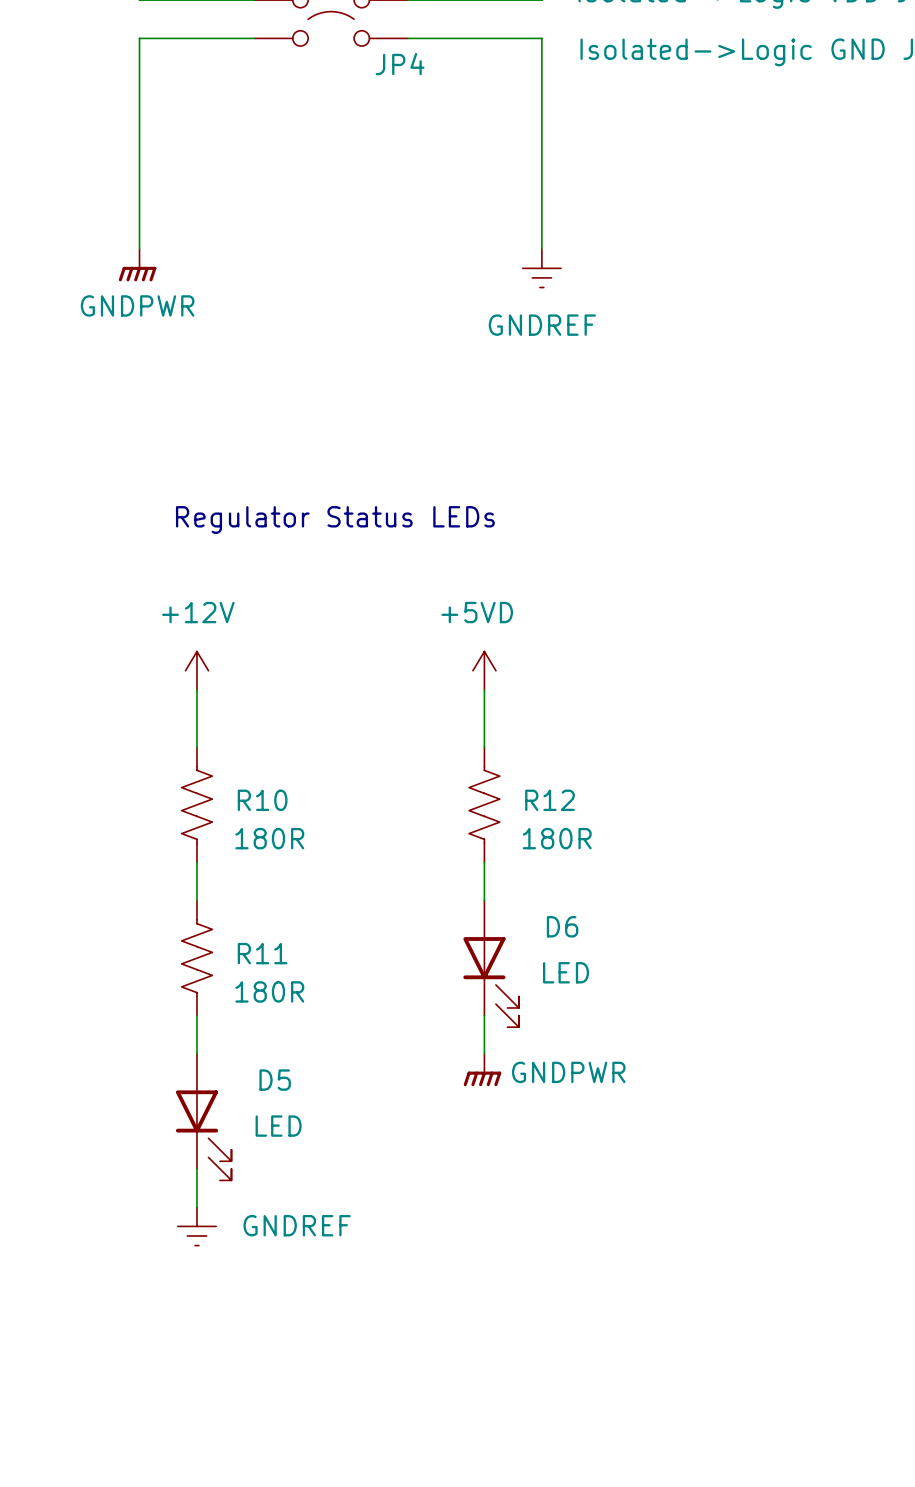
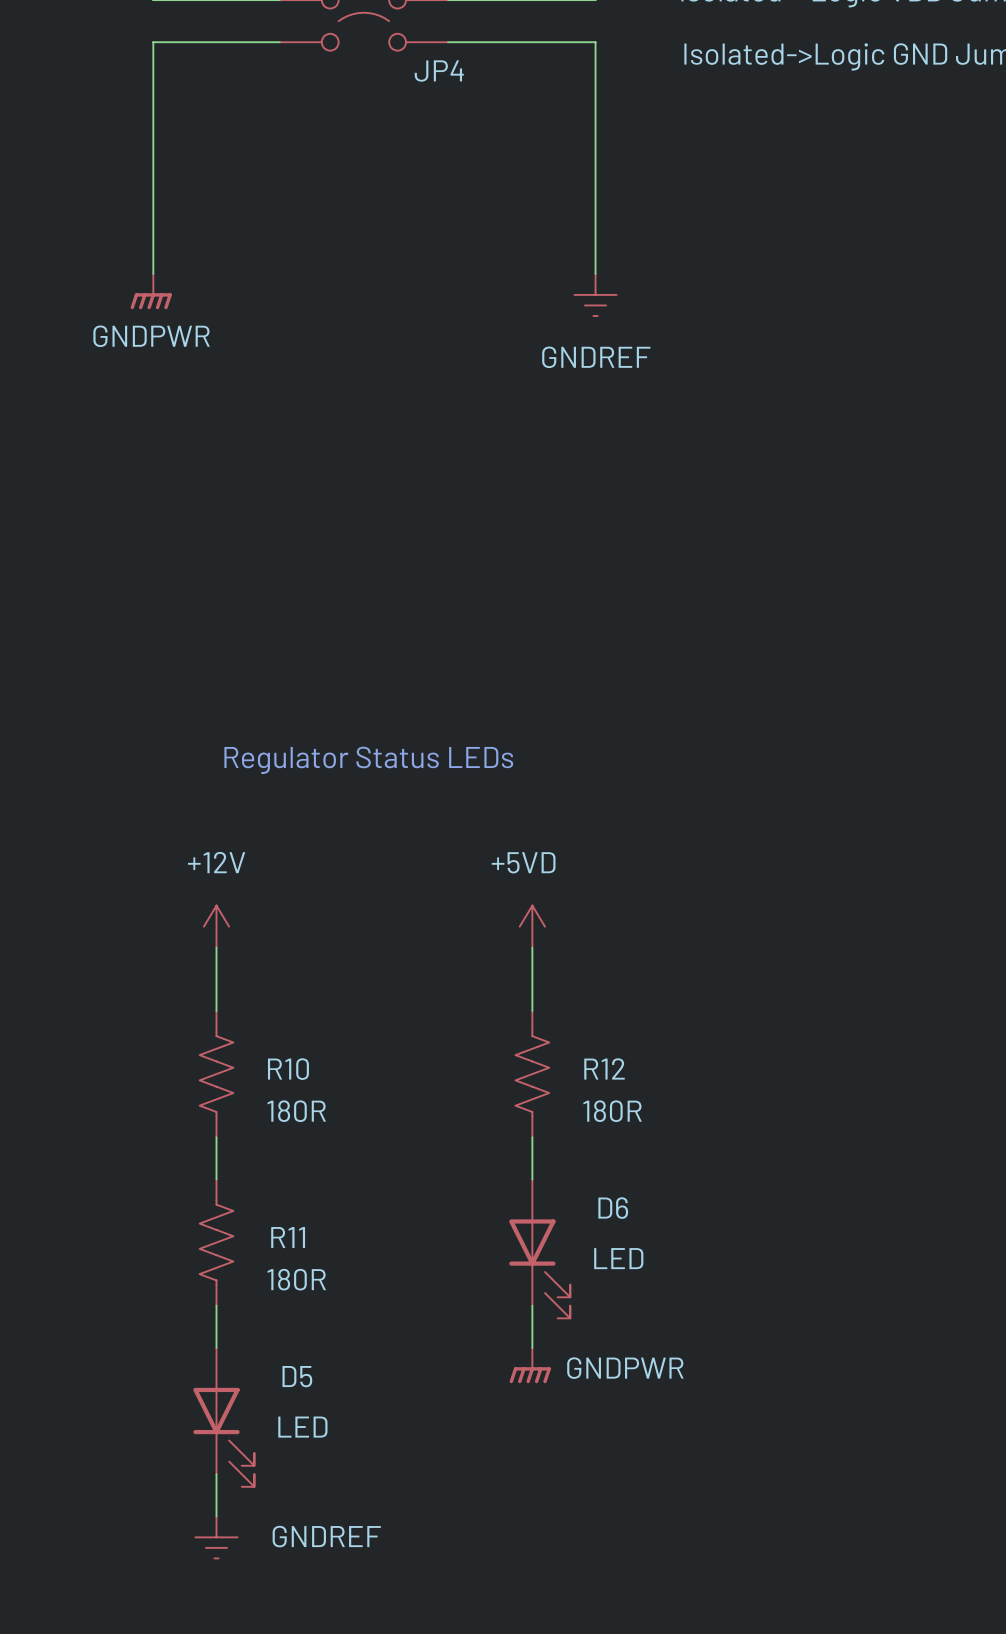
text position: Regulator Status LEDs (335, 519) -> Regulator Status LEDs (368, 760)
power symbol position: +12V (196, 670) -> +12V (216, 926)
power symbol position: +5VD (484, 670) -> +5VD (532, 926)
wire: (196, 689) (196, 747) -> none
wire: (484, 689) (484, 747) -> none
R10 position: (196, 804) -> (216, 1074)
R12 position: (484, 804) -> (532, 1074)
R11 position: (196, 958) -> (216, 1242)
D6 position: (491, 963) -> (539, 1248)
power symbol position: GNDPWR (482, 1070) -> GNDPWR (530, 1365)
D5 position: (203, 1117) -> (223, 1417)
wire: none -> (532, 1305) (532, 1347)
power symbol position: GNDREF (196, 1226) -> GNDREF (216, 1537)
wire: none -> (216, 1474) (216, 1516)

